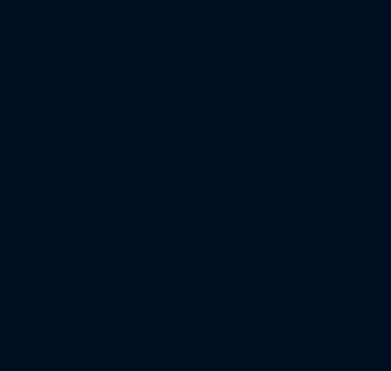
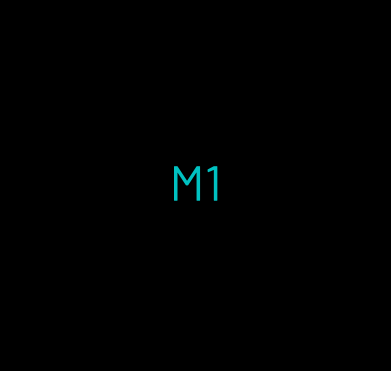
M1: none -> (195, 183)

